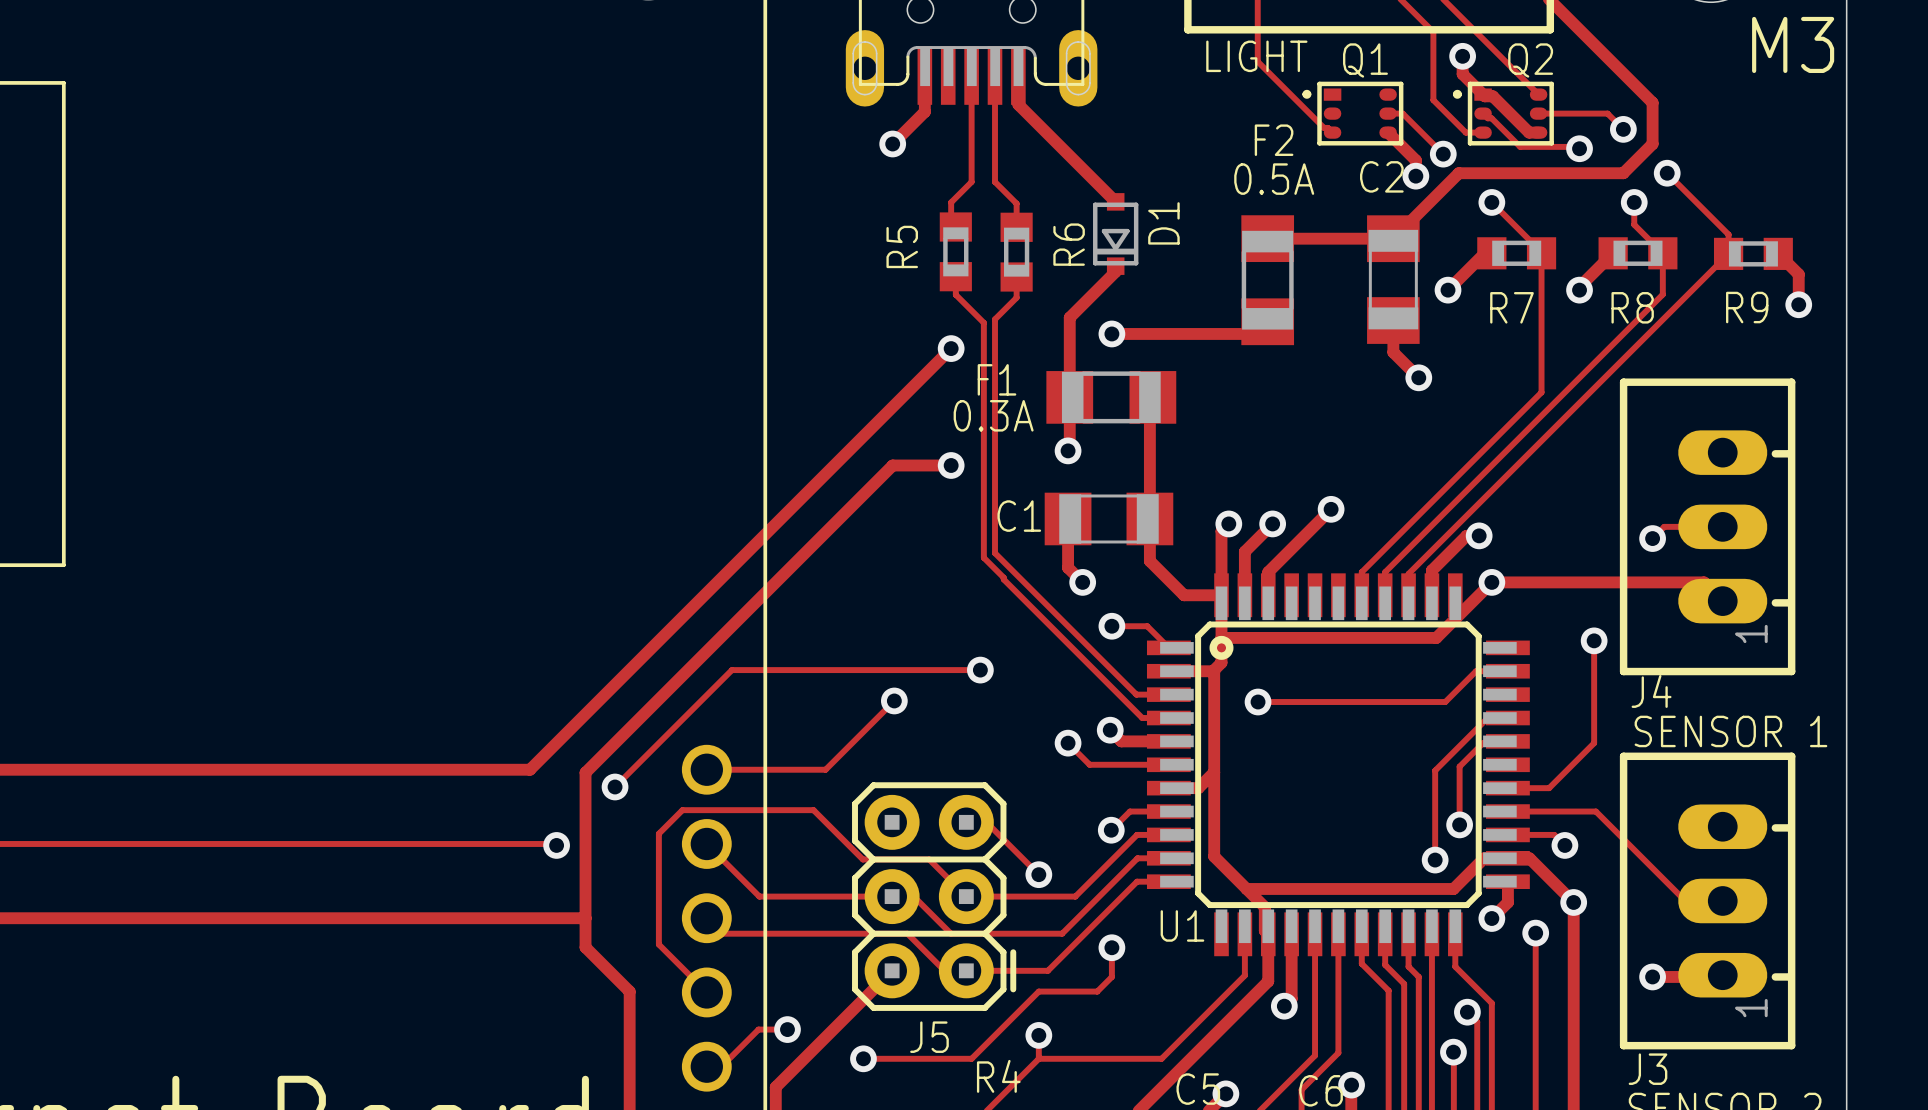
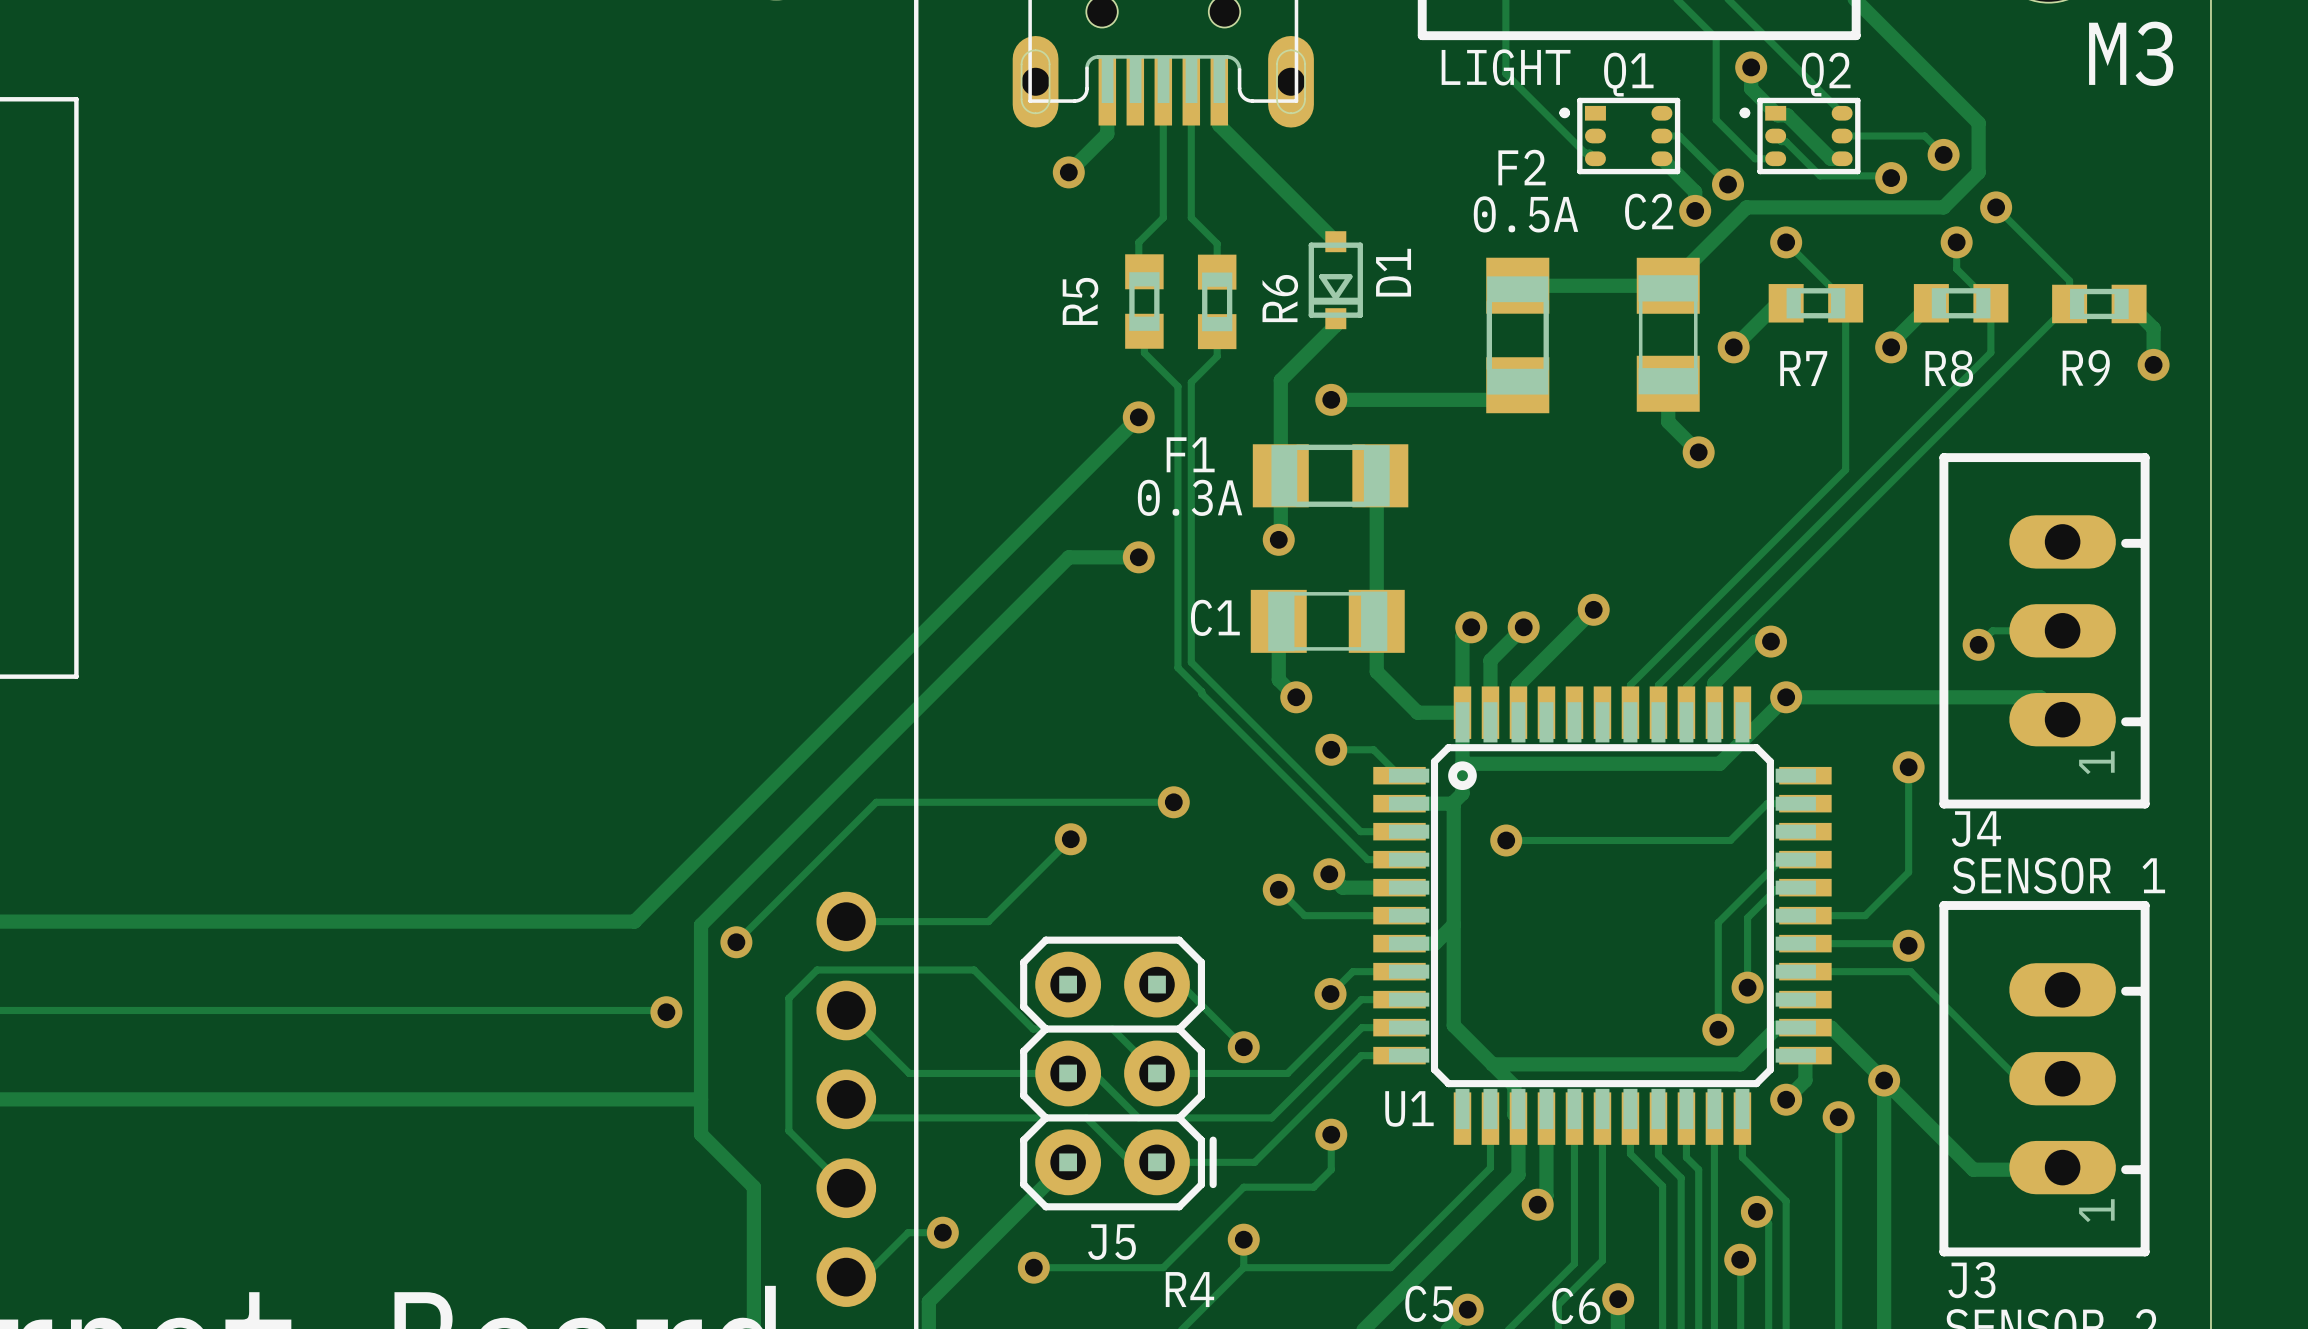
track: (1594, 728) (1594, 743) (1549, 788) -> (1908, 872) (1865, 915) (1805, 915)
track: none -> (1854, 943) (1906, 943) (1908, 945)
track: (1507, 834) (1554, 834) (1564, 845) -> none
via position: (1564, 845) -> (1908, 945)
track: none -> (1884, 1080) (1973, 1169) (1978, 1169)
via: (1652, 976) -> none

